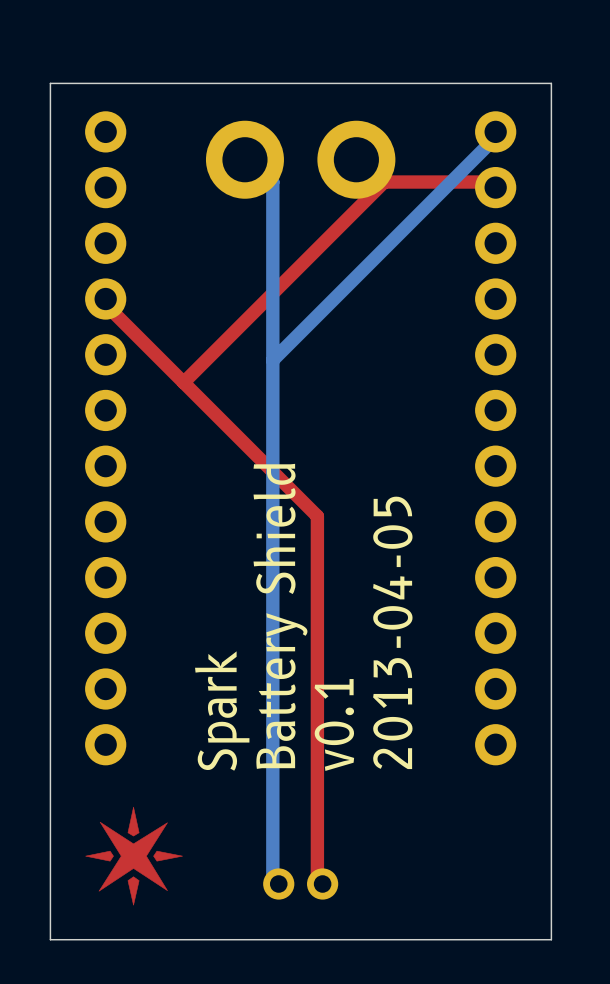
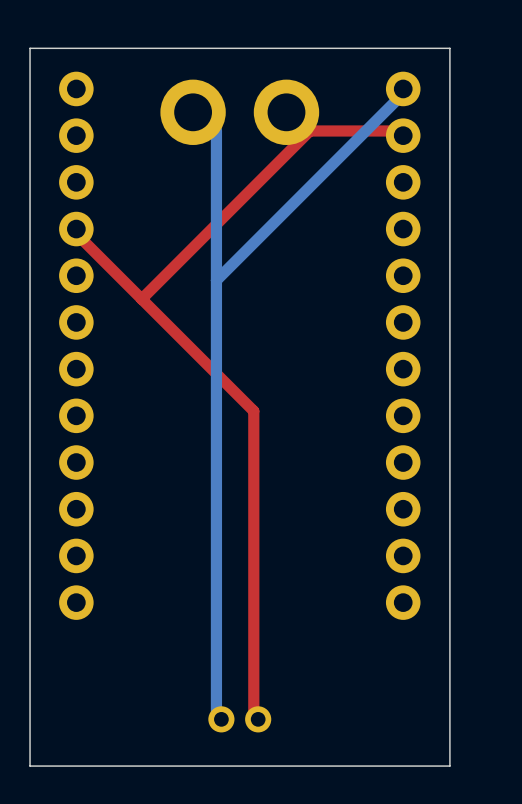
text: Battery Shield (280, 616) -> none
text: 2013-04-05 (392, 632) -> none
text: Spark (222, 711) -> none
text: v0.1 (334, 724) -> none
drawing: [85, 806, 183, 906] -> none

